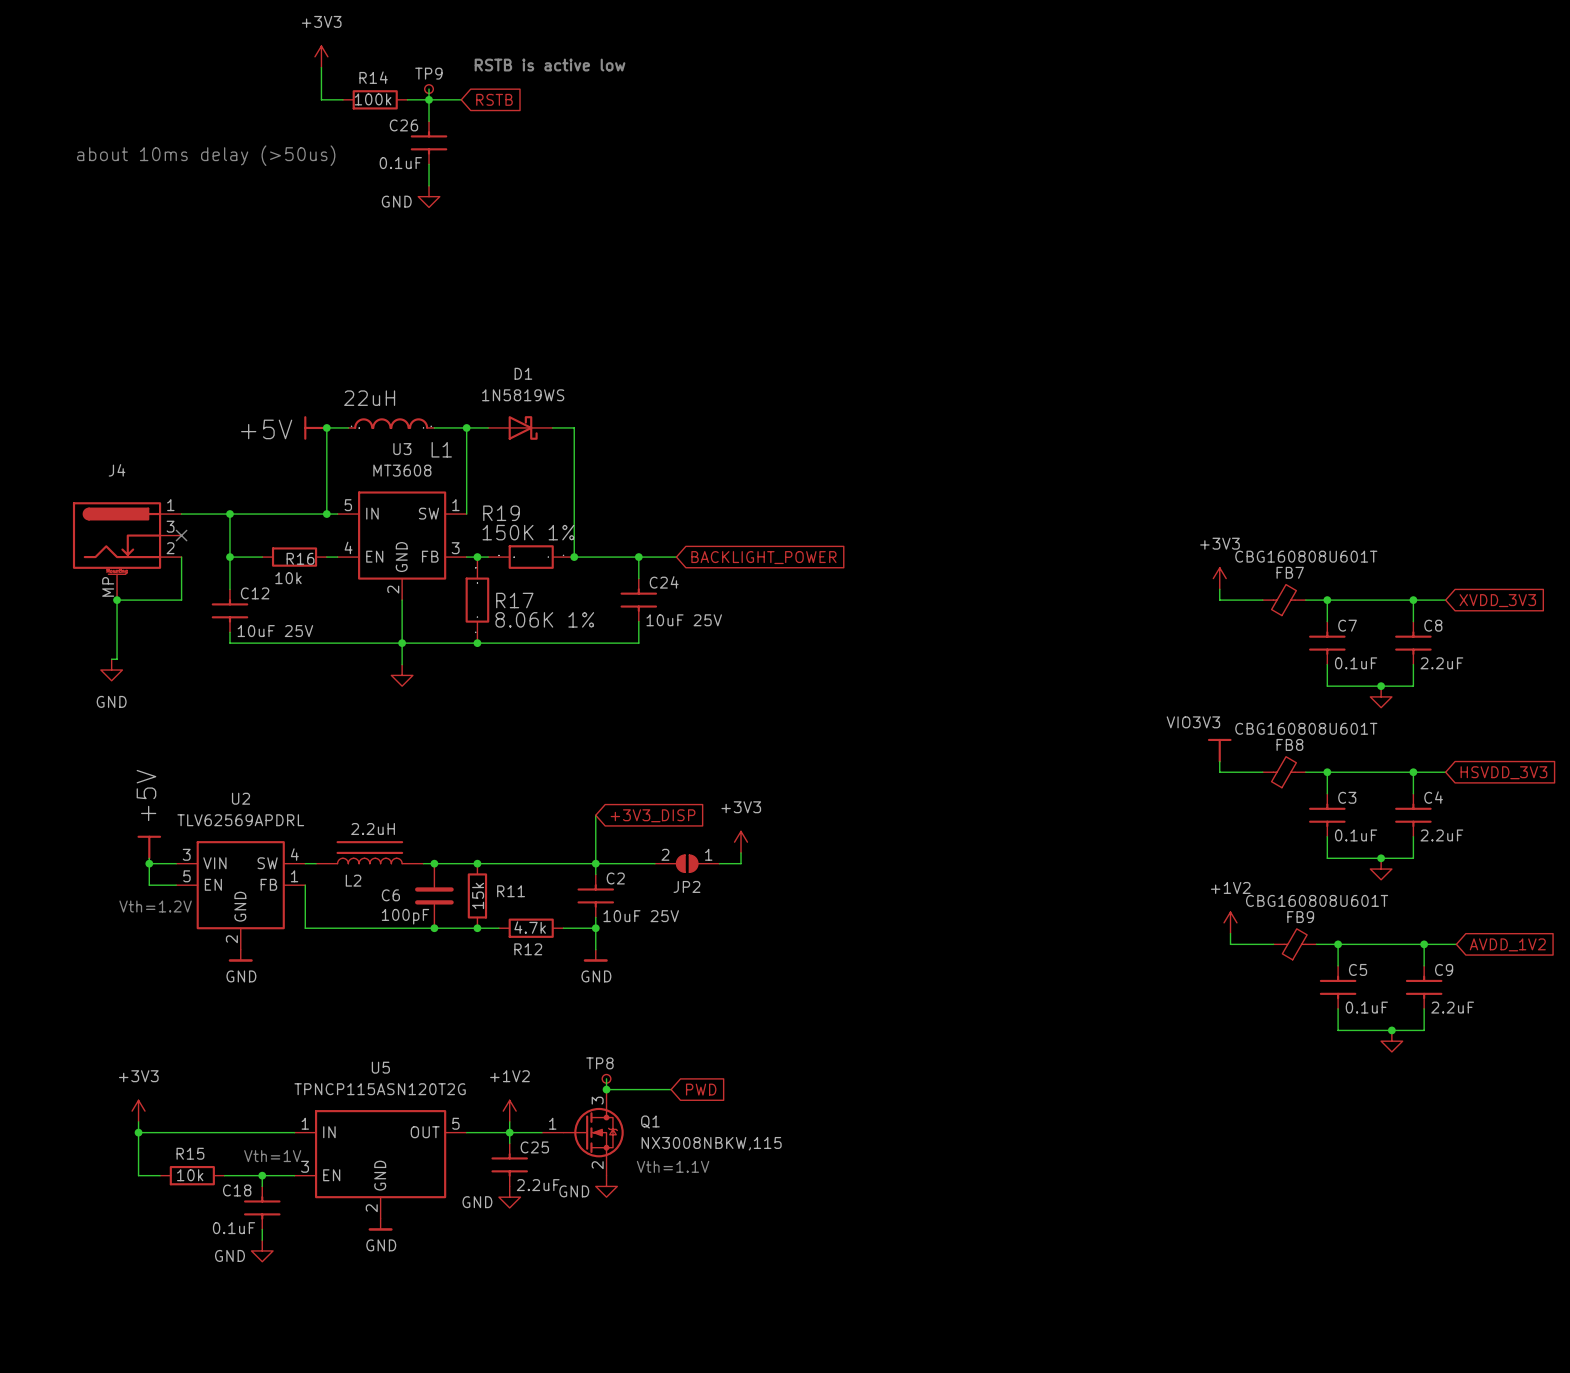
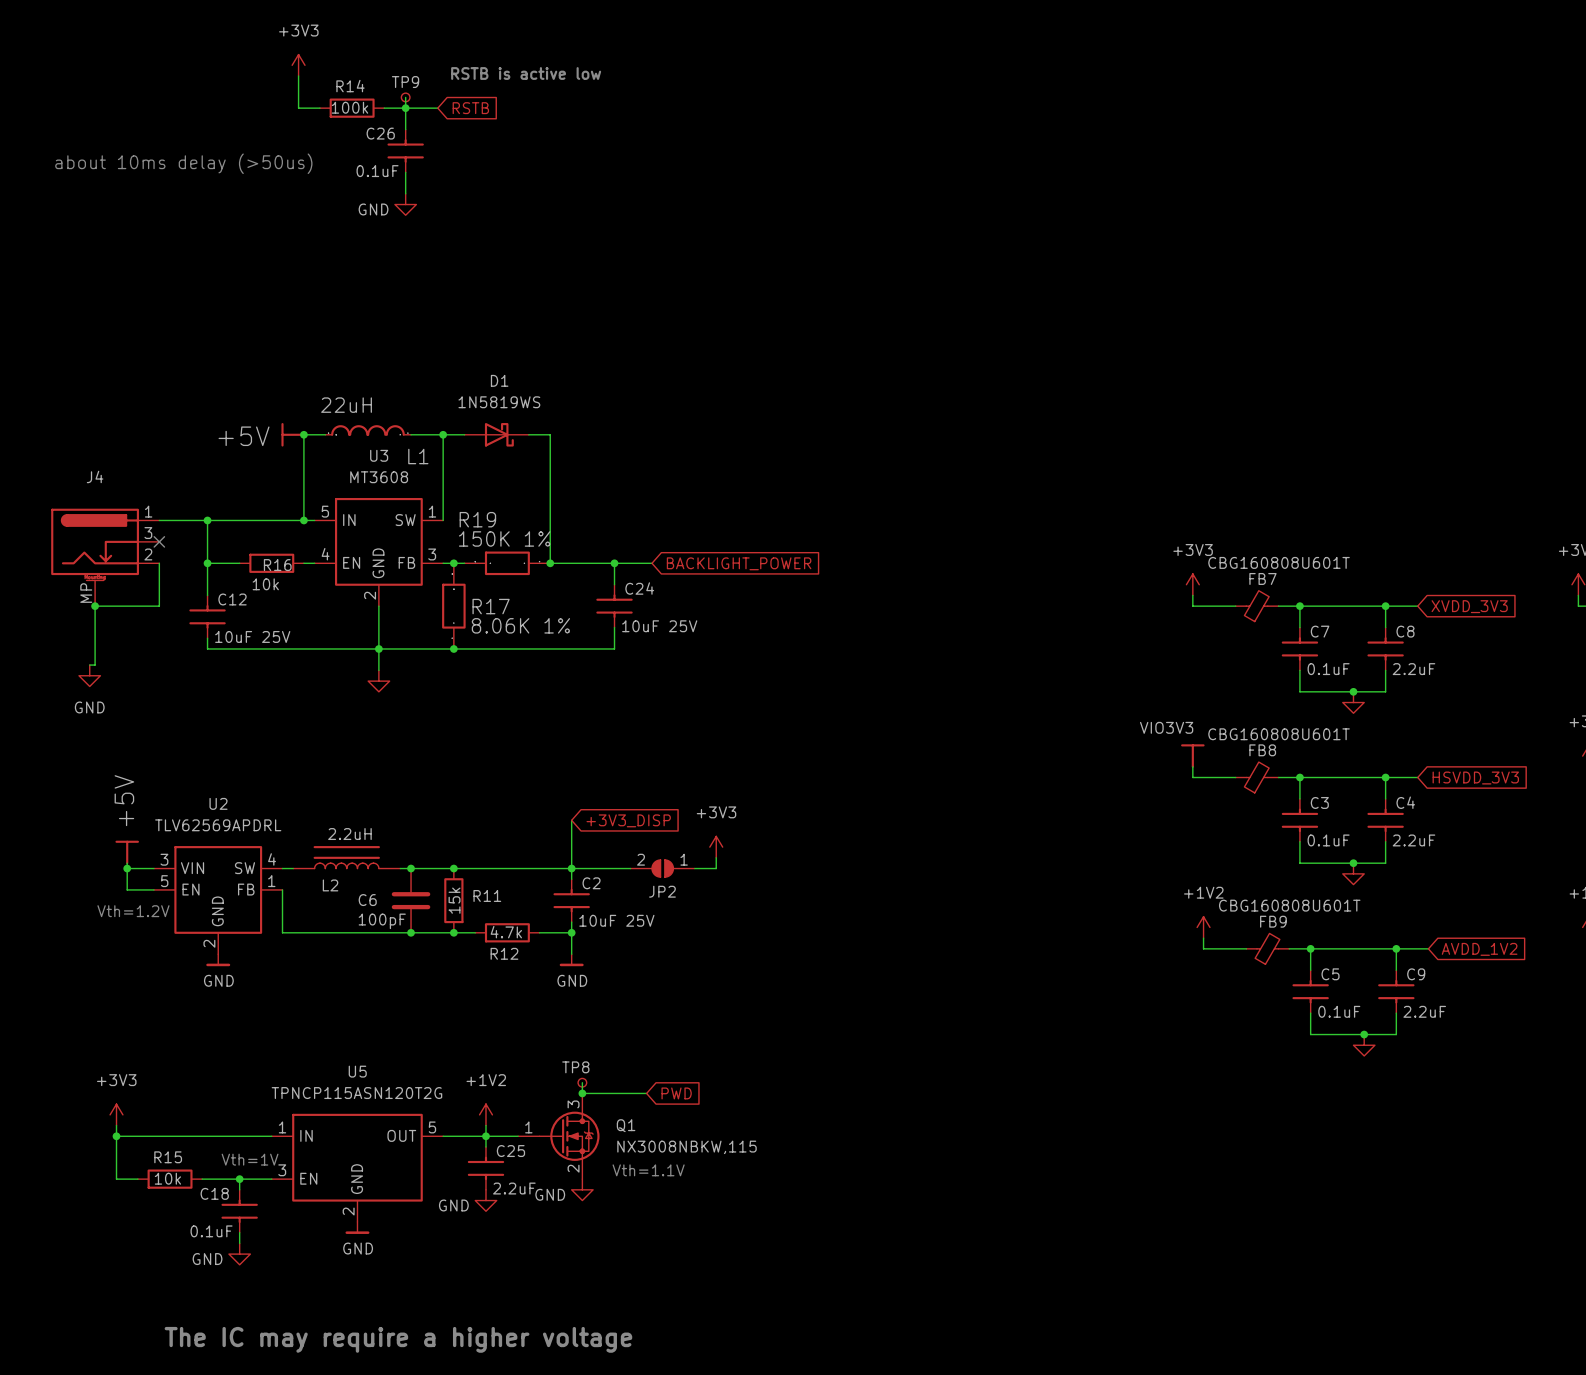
text: none -> The IC may require a higher voltage (398, 1339)

